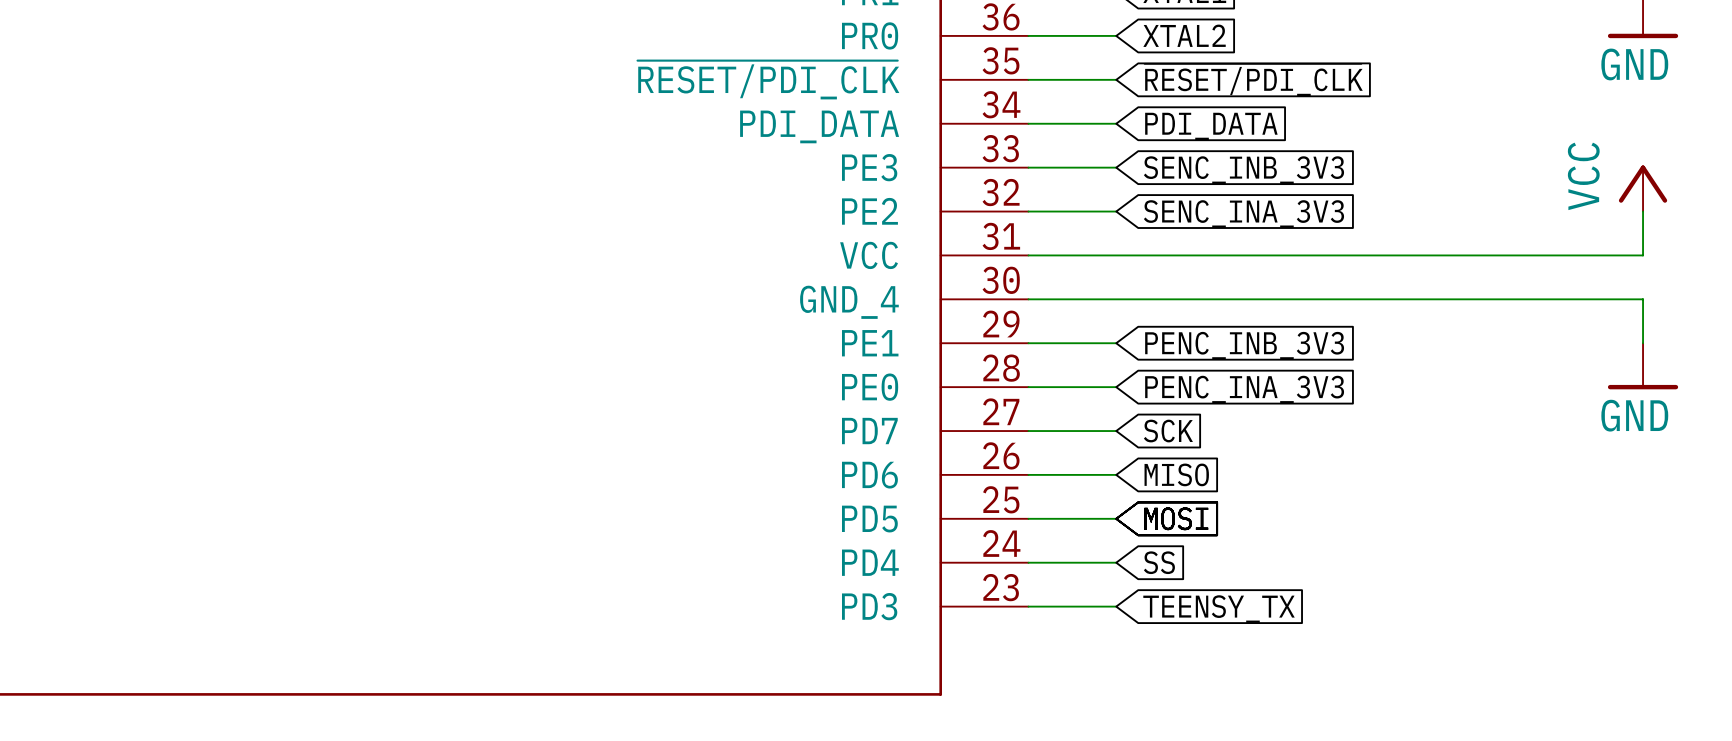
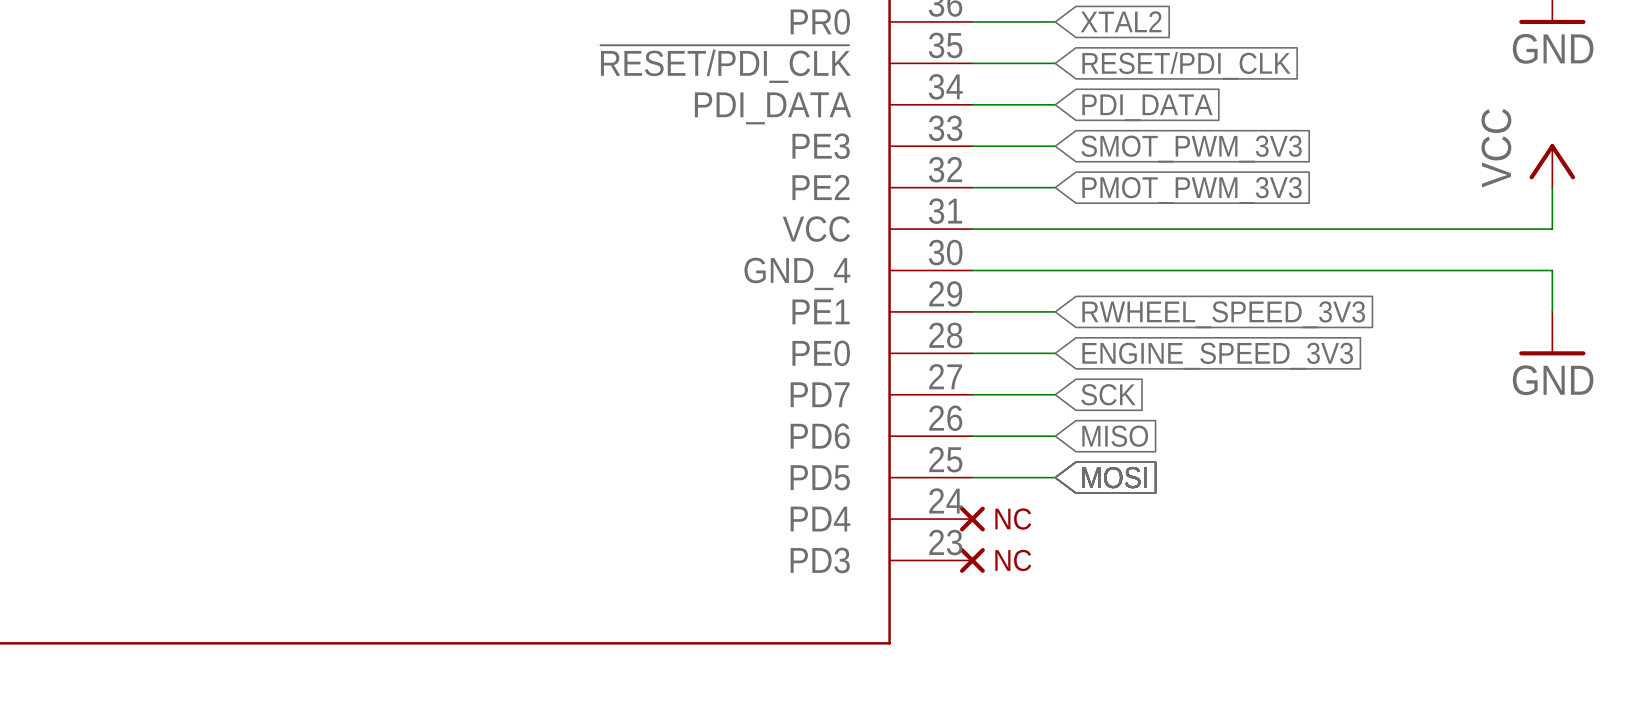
global label: ~{RESET/PDI_CLK} (1253, 79) -> RESET/PDI_CLK (1186, 65)
global label: SENC_INB_3V3 (1243, 170) -> SMOT_PWM_3V3 (1191, 149)
global label: SENC_INA_3V3 (1243, 214) -> PMOT_PWM_3V3 (1192, 190)
global label: PENC_INB_3V3 (1244, 345) -> RWHEEL_SPEED_3V3 (1223, 314)
global label: PENC_INA_3V3 (1244, 389) -> ENGINE_SPEED_3V3 (1217, 356)
wire: (1028, 562) (1116, 562) -> none
part: none -> (972, 519)
global label: SS (1159, 562) -> none
wire: (1028, 606) (1116, 606) -> none
part: none -> (972, 560)
global label: TEENSY_TX (1219, 609) -> none

